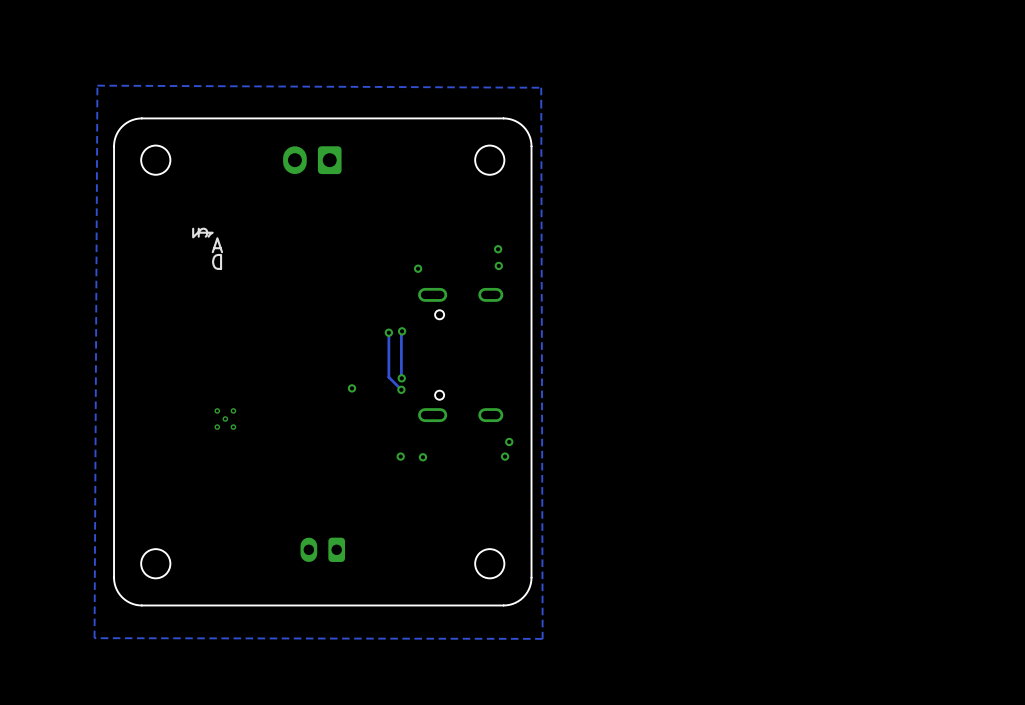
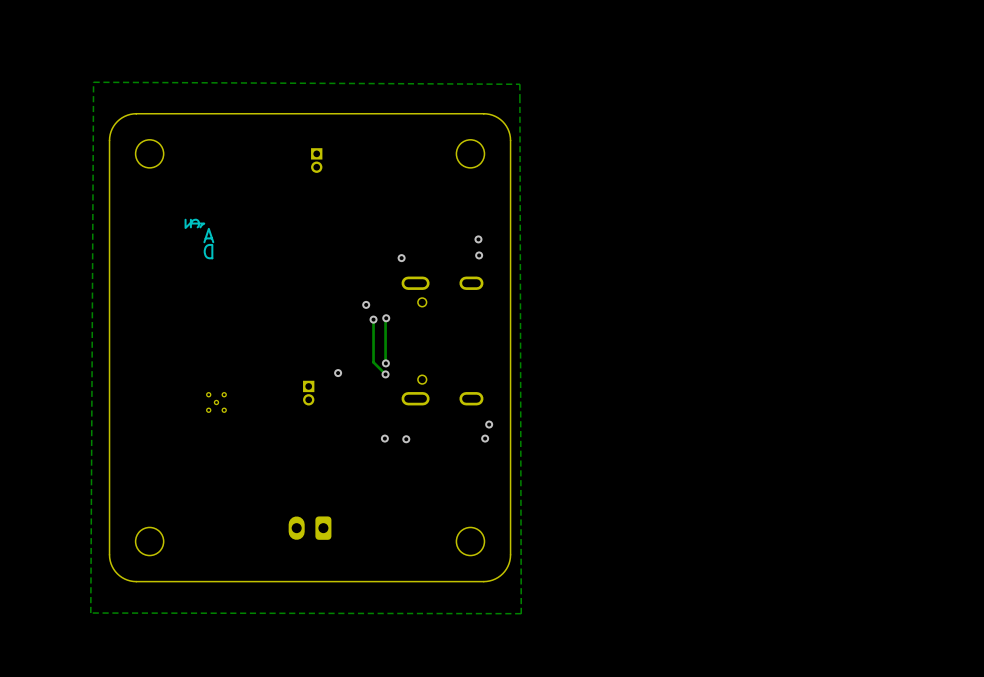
part: (312, 160) -> none
part: none -> (316, 160)
via: none -> (366, 304)
part: none -> (308, 393)

